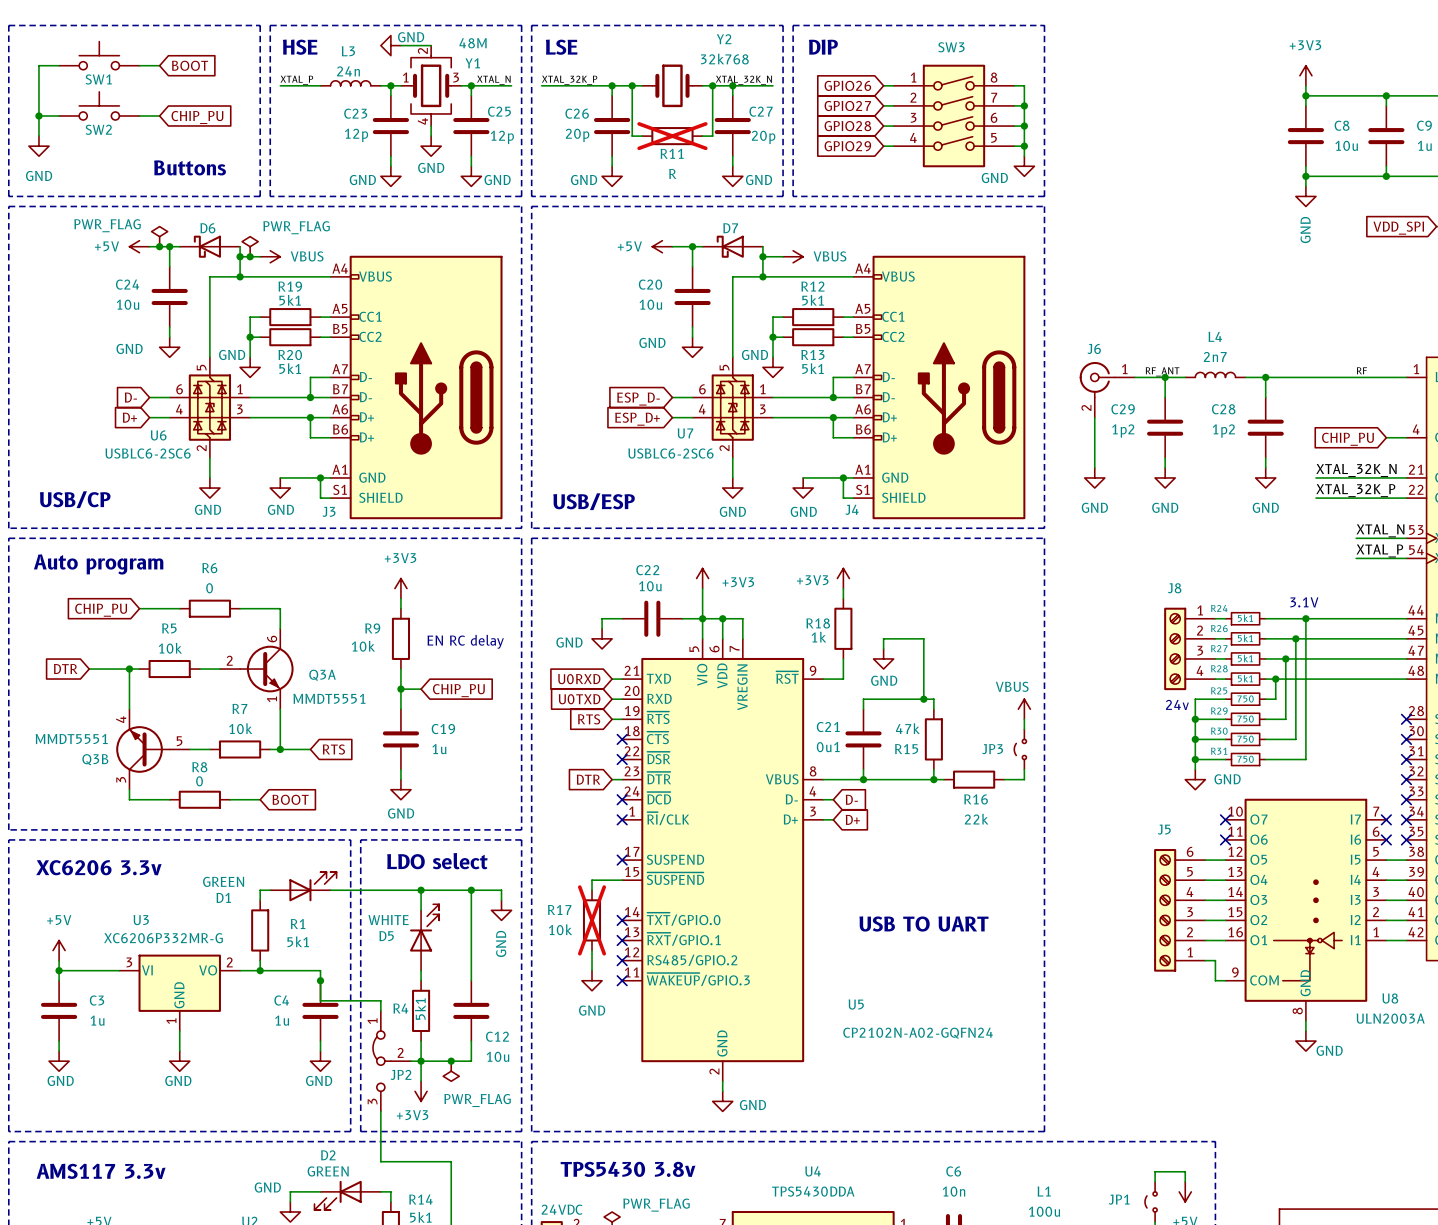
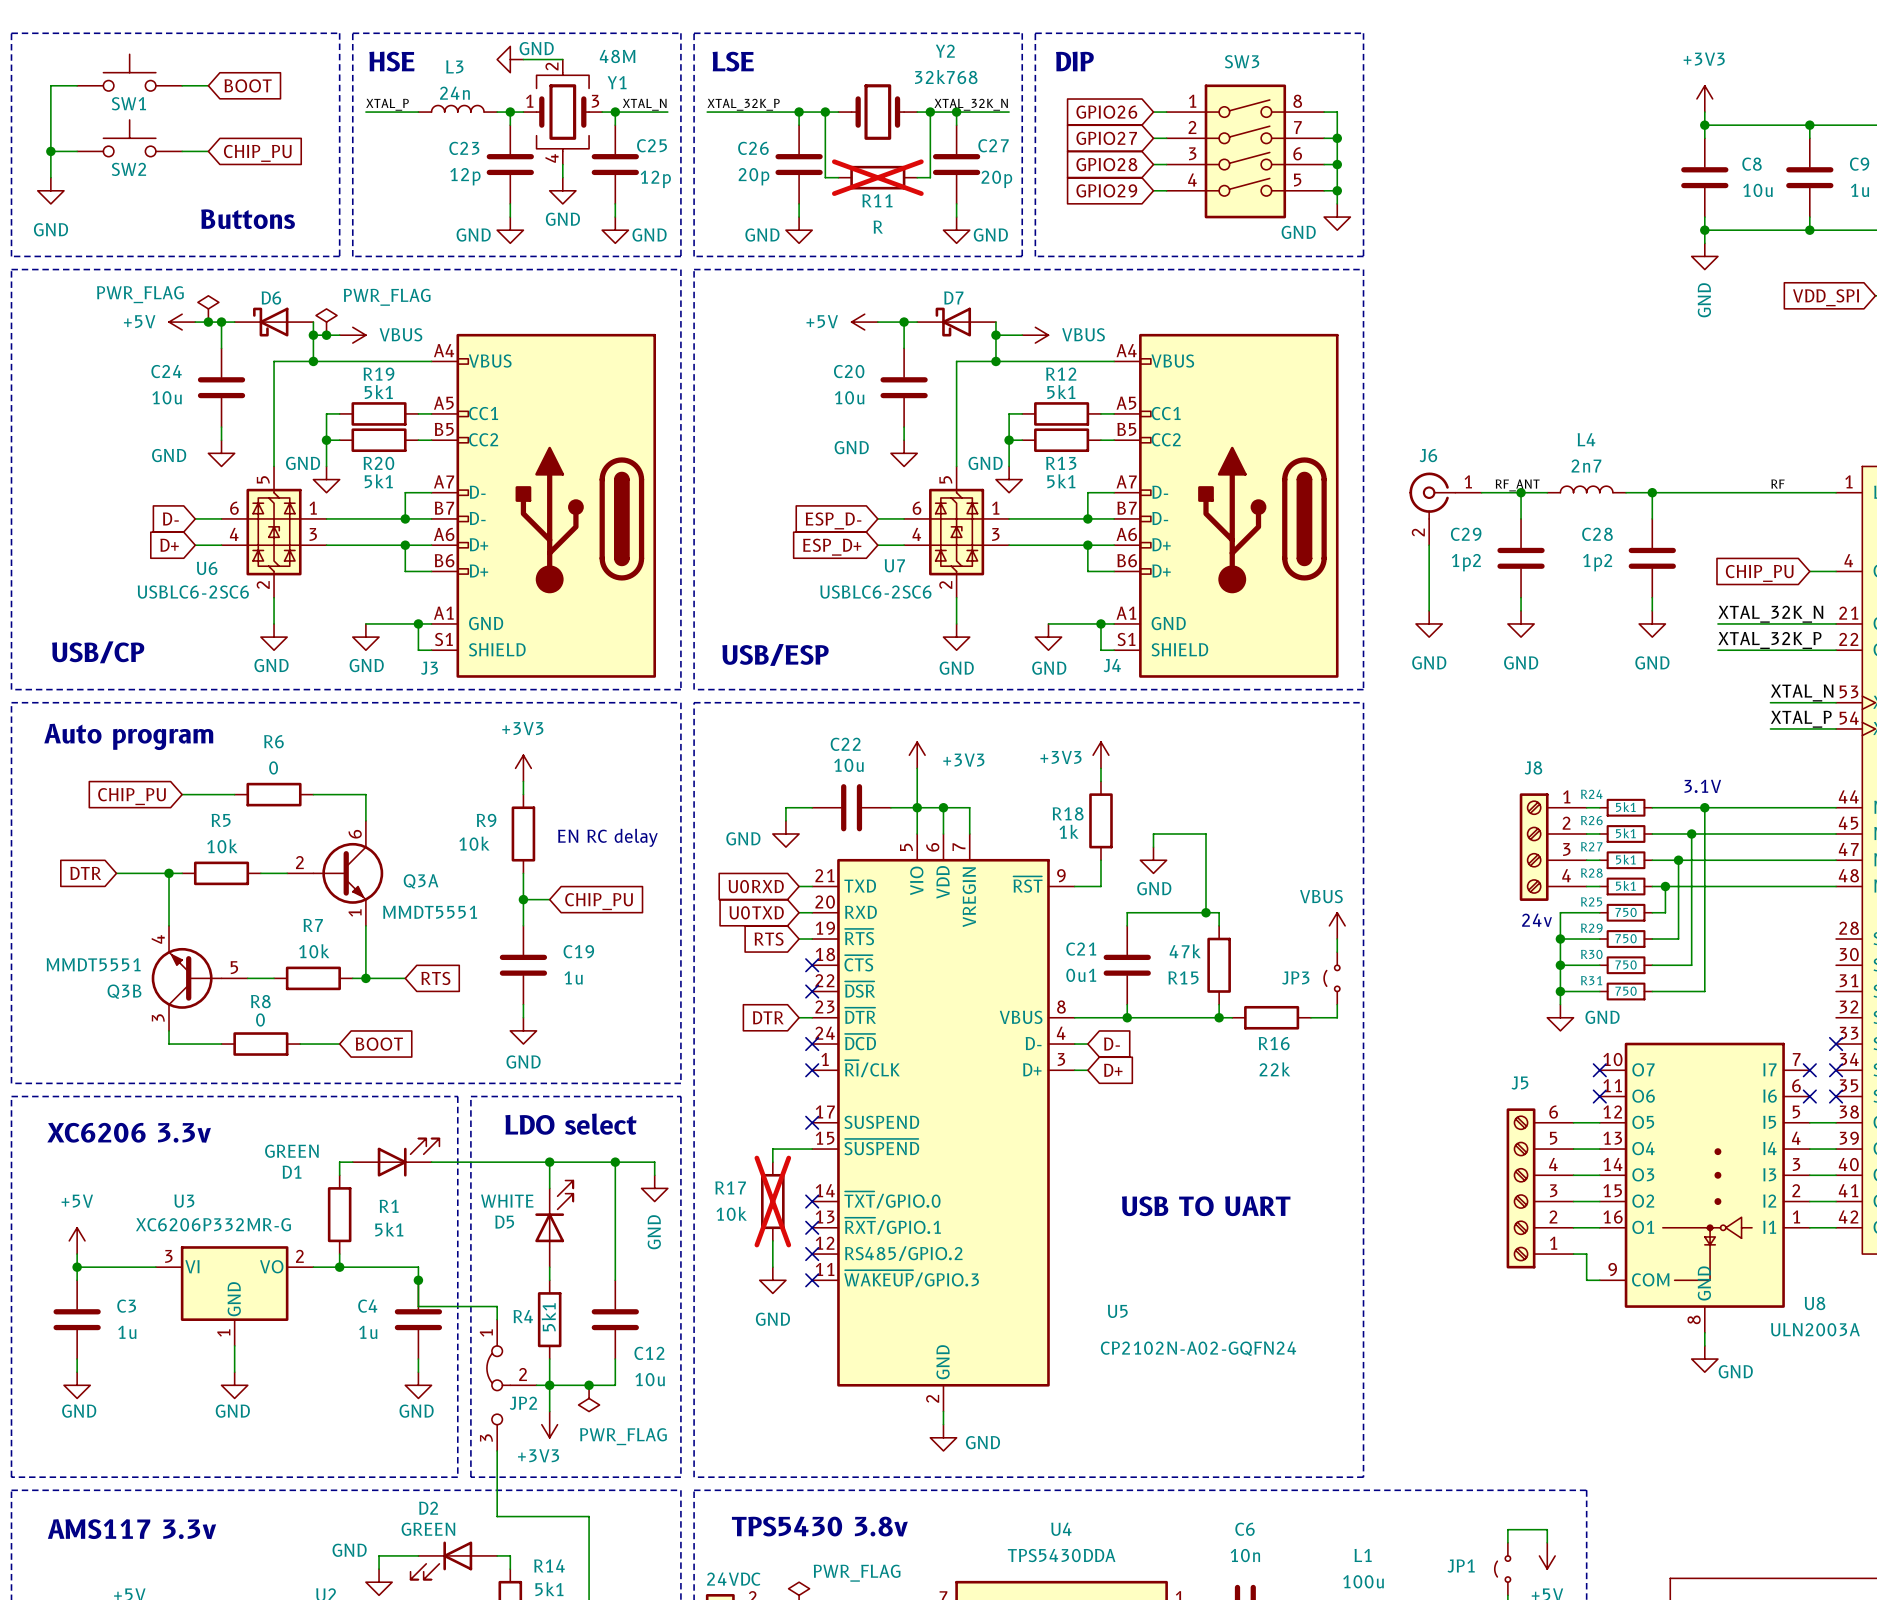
no-connect mark: (1406, 719) -> none
no-connect mark: (1406, 739) -> none
no-connect mark: (1406, 759) -> none
no-connect mark: (1406, 779) -> none

